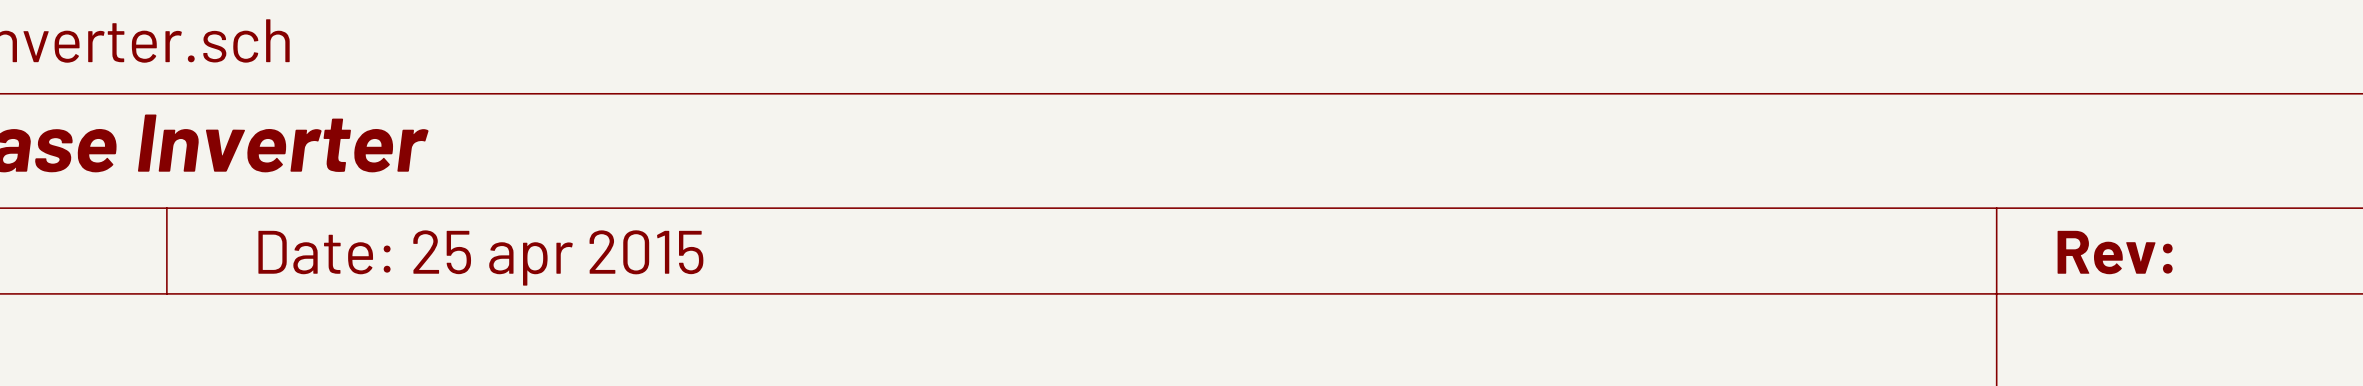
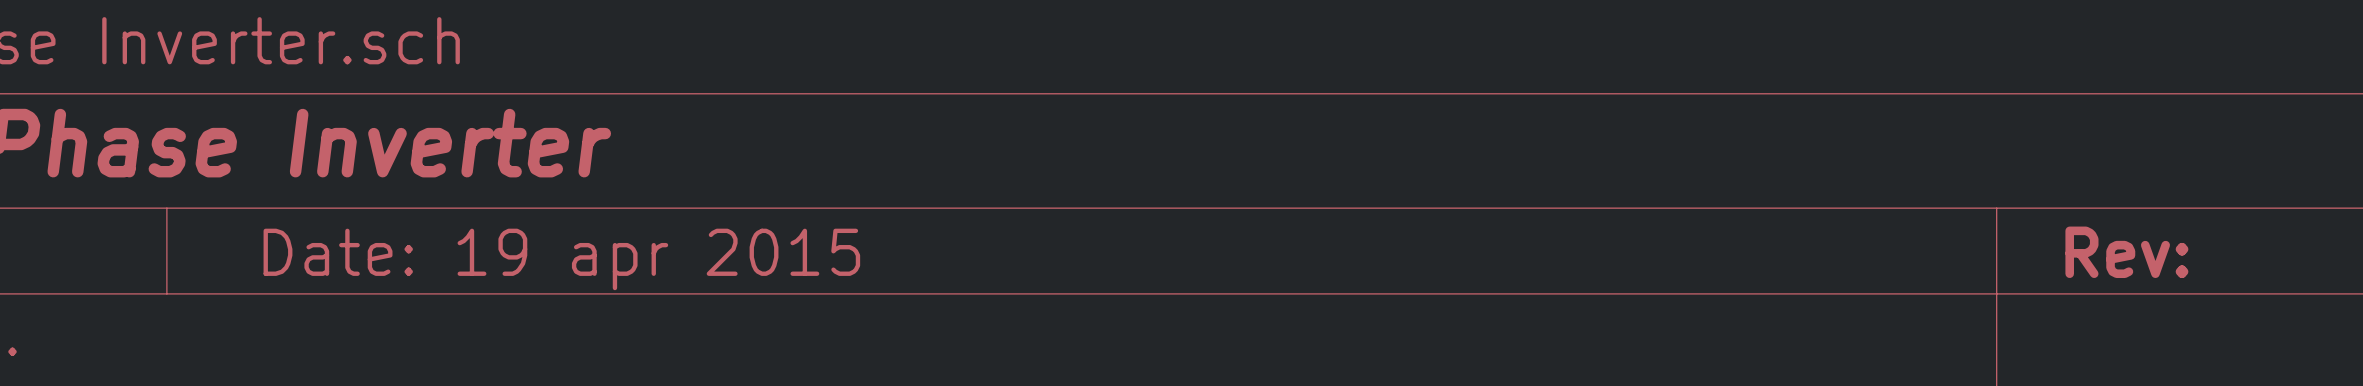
title block: Date: 25 apr 2015 (480, 257) -> Date: 19 apr 2015 (561, 259)

